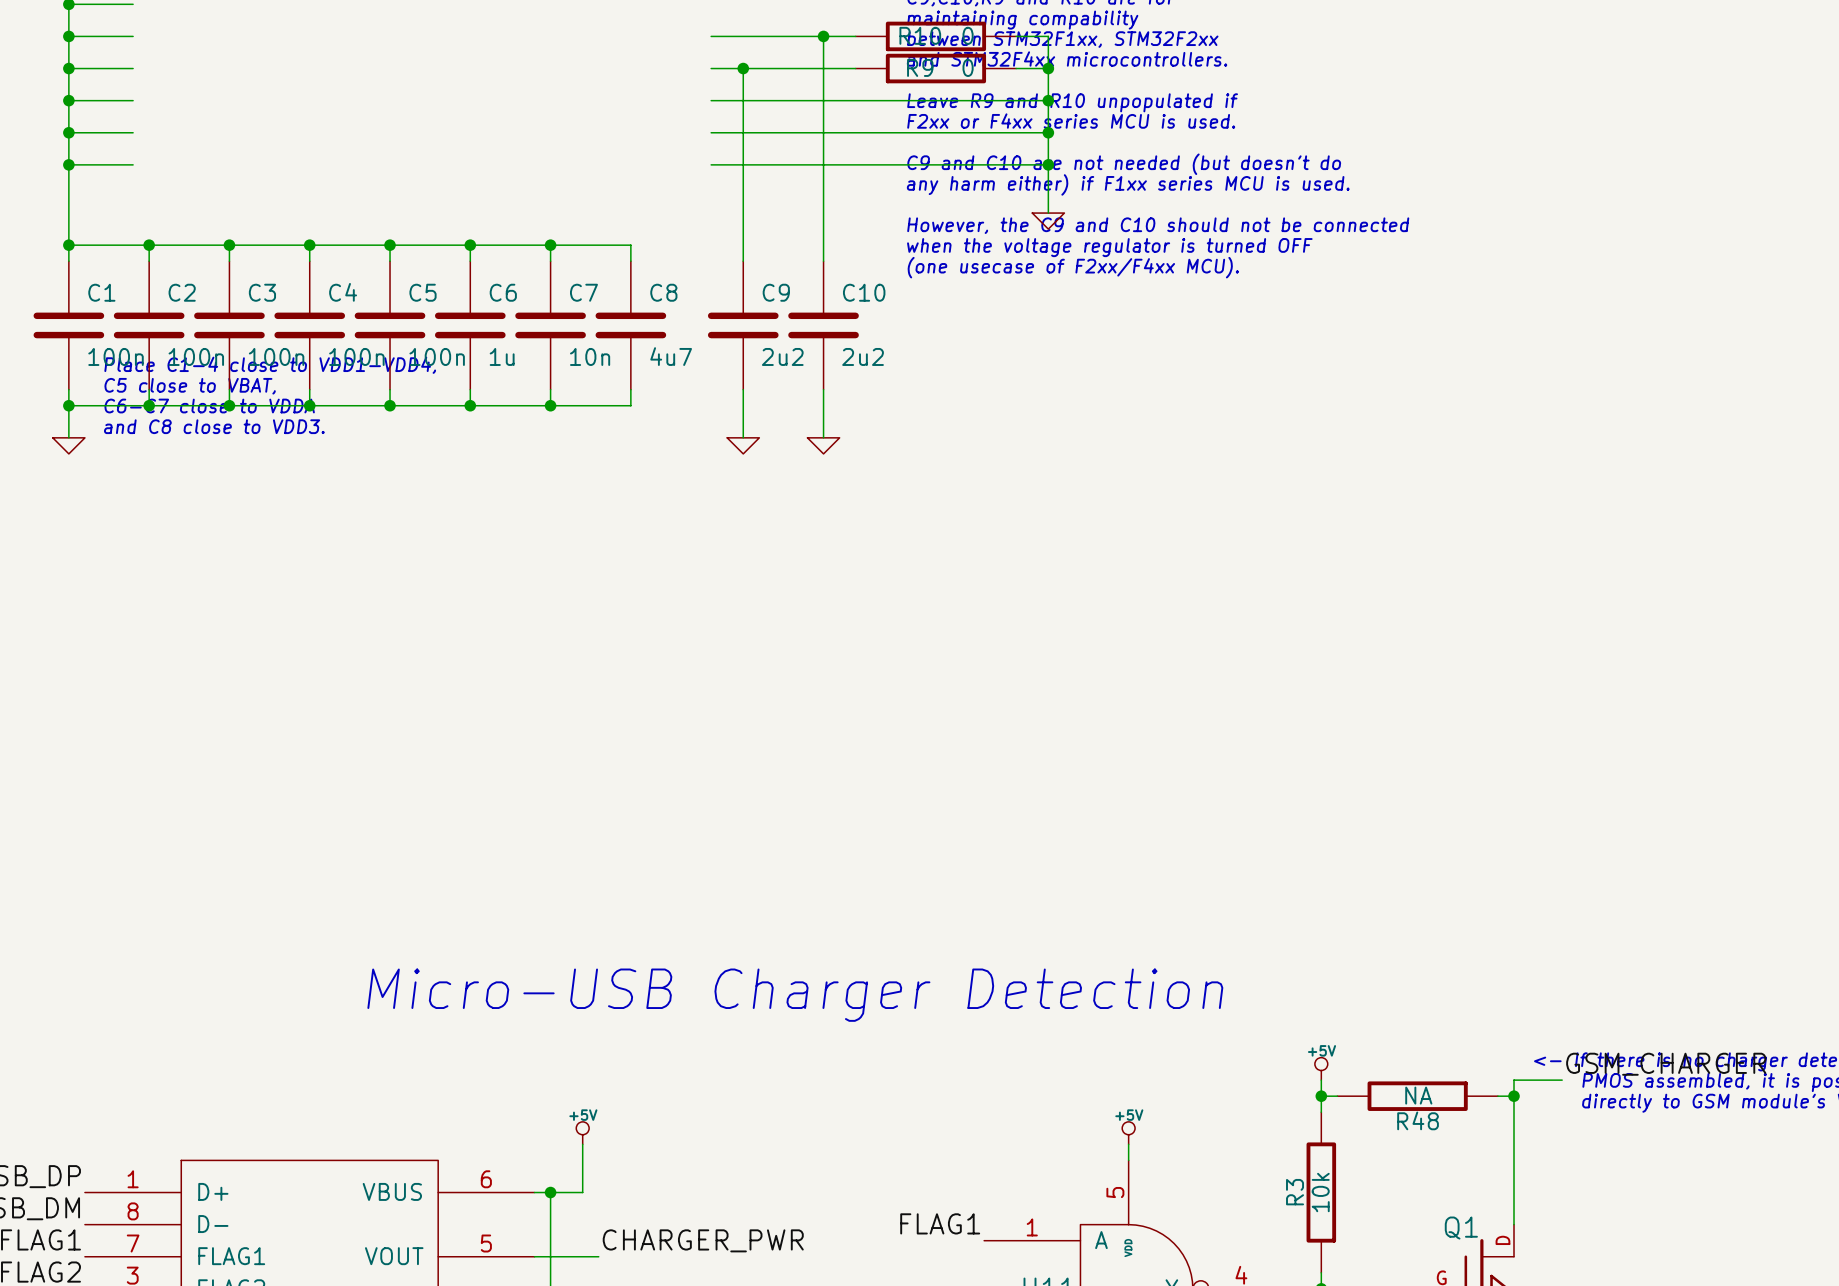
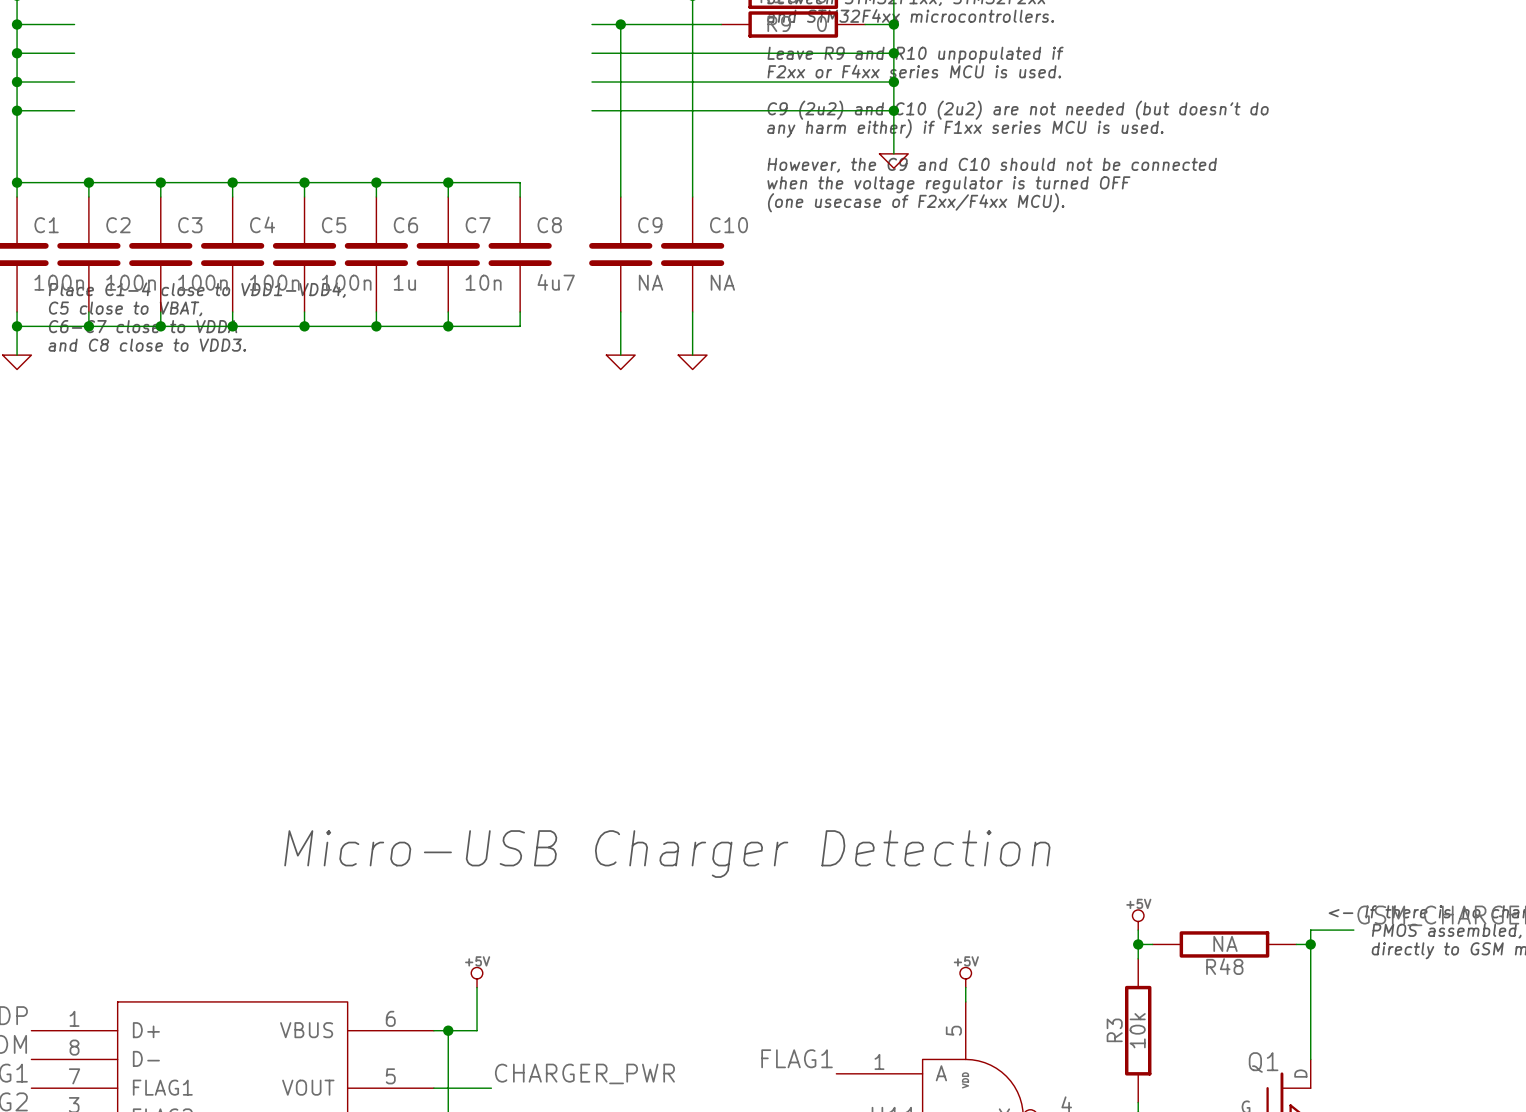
text: C9 and C10 are not needed (but doesn't do (1124, 164) -> C9 (2u2) and C10 (2u2) are not needed (but doesn't do (1018, 110)
C9 value: 2u2 (782, 356) -> NA (650, 282)
C10 value: 2u2 (863, 356) -> NA (722, 282)

